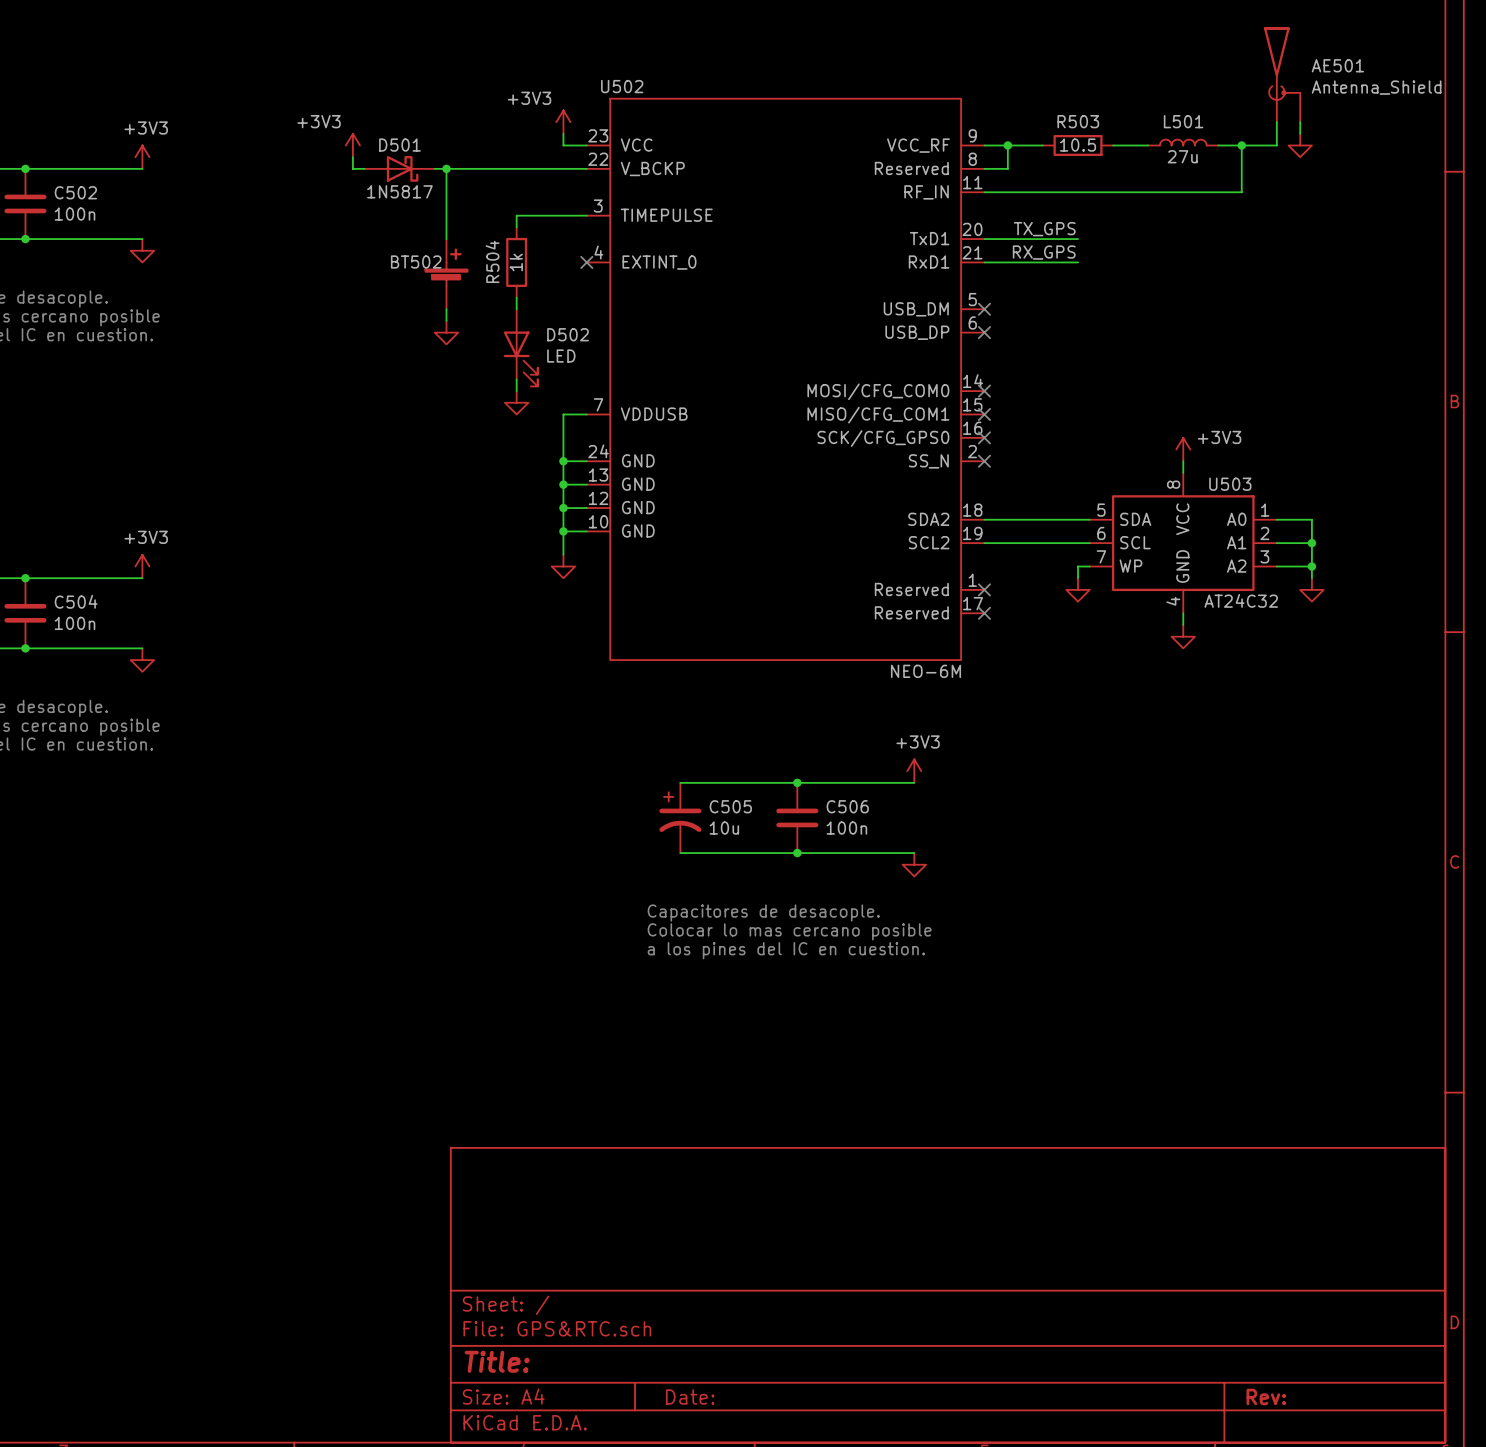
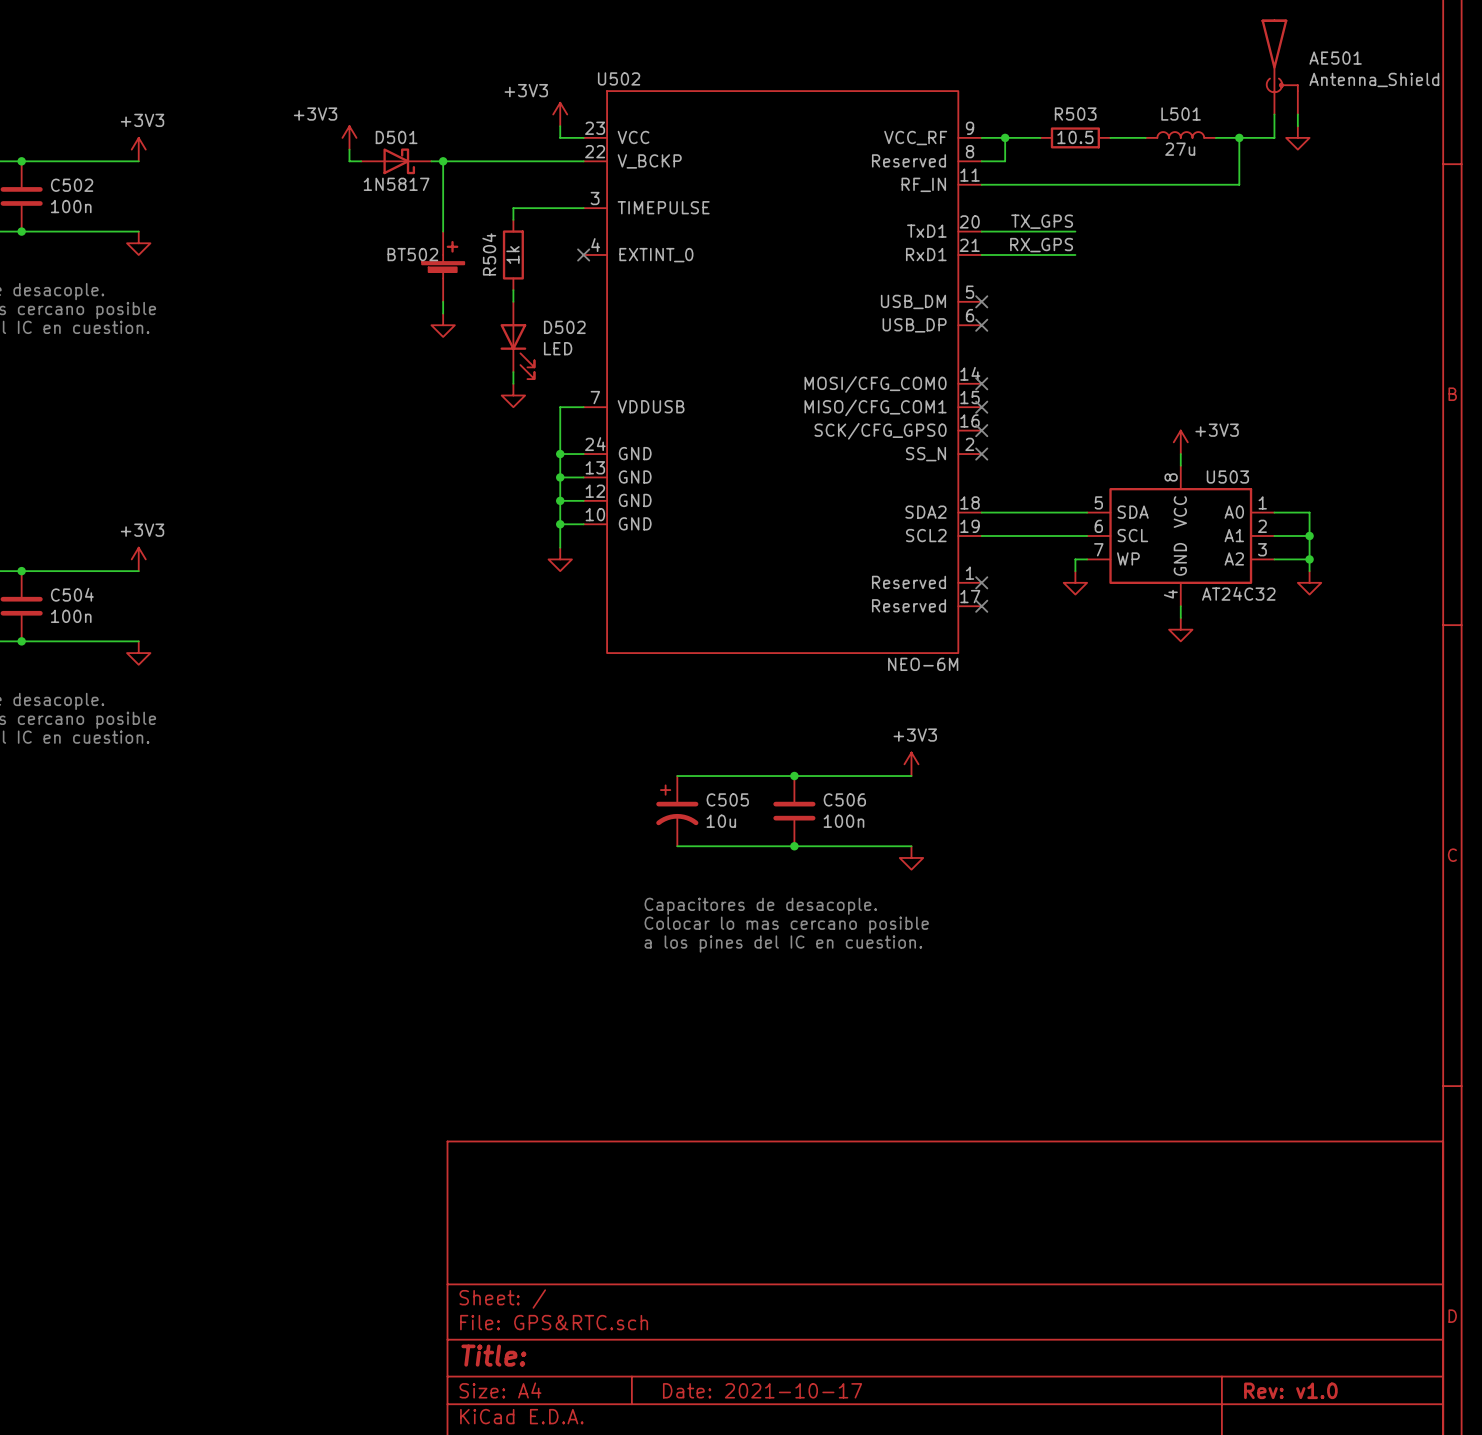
title block: Date: (690, 1396) -> Date: 2021-10-17 (762, 1390)
title block: Rev: (1266, 1396) -> Rev: v1.0 (1290, 1390)

